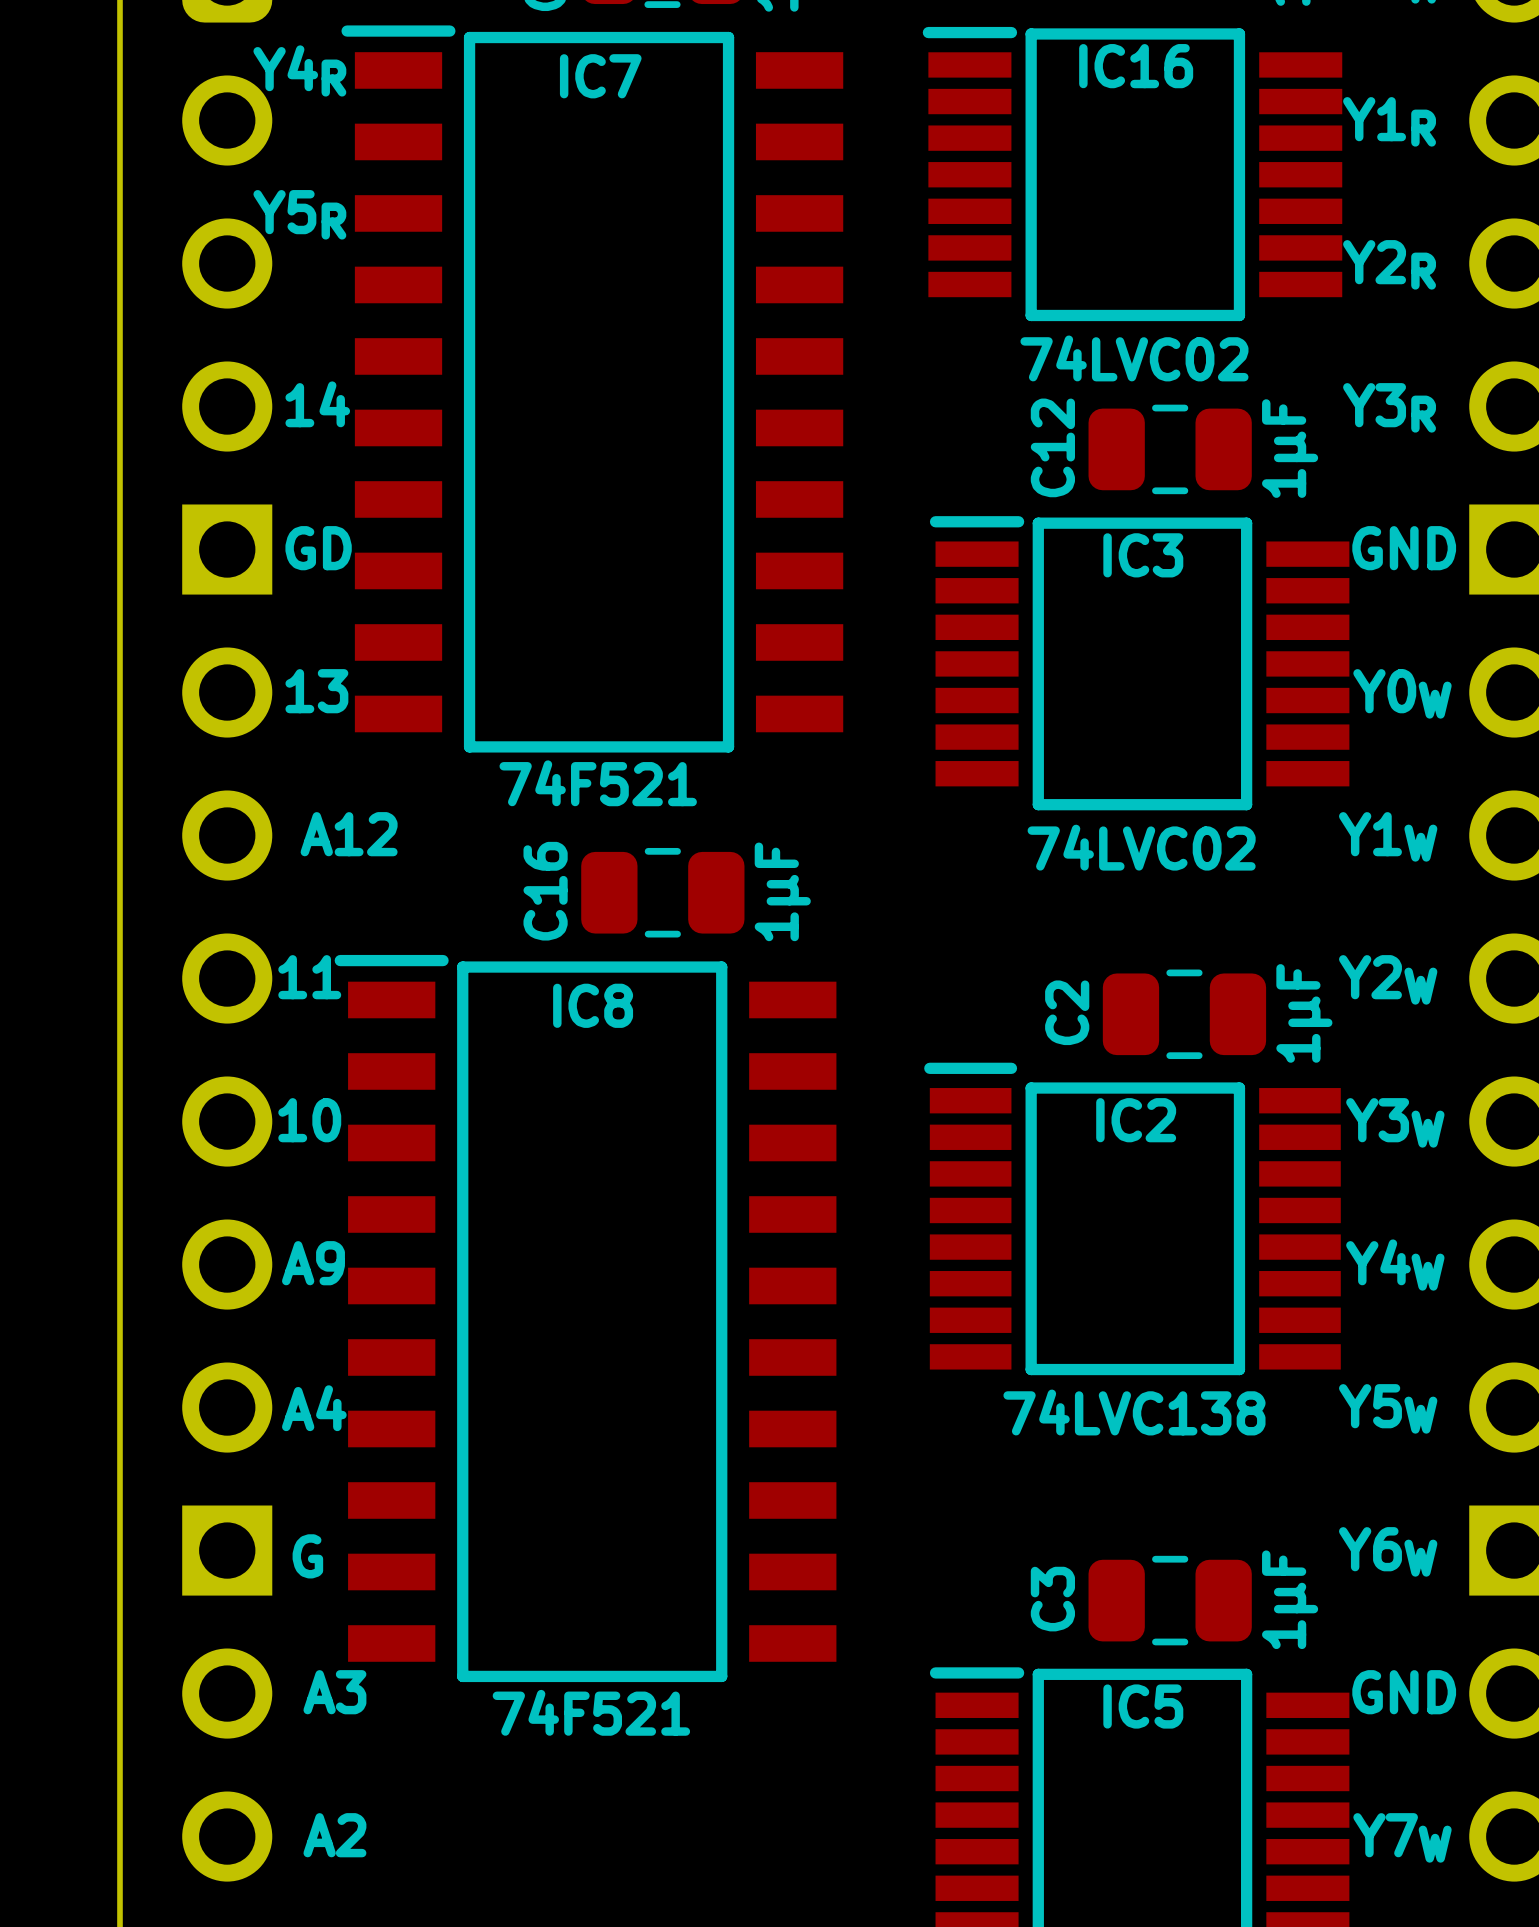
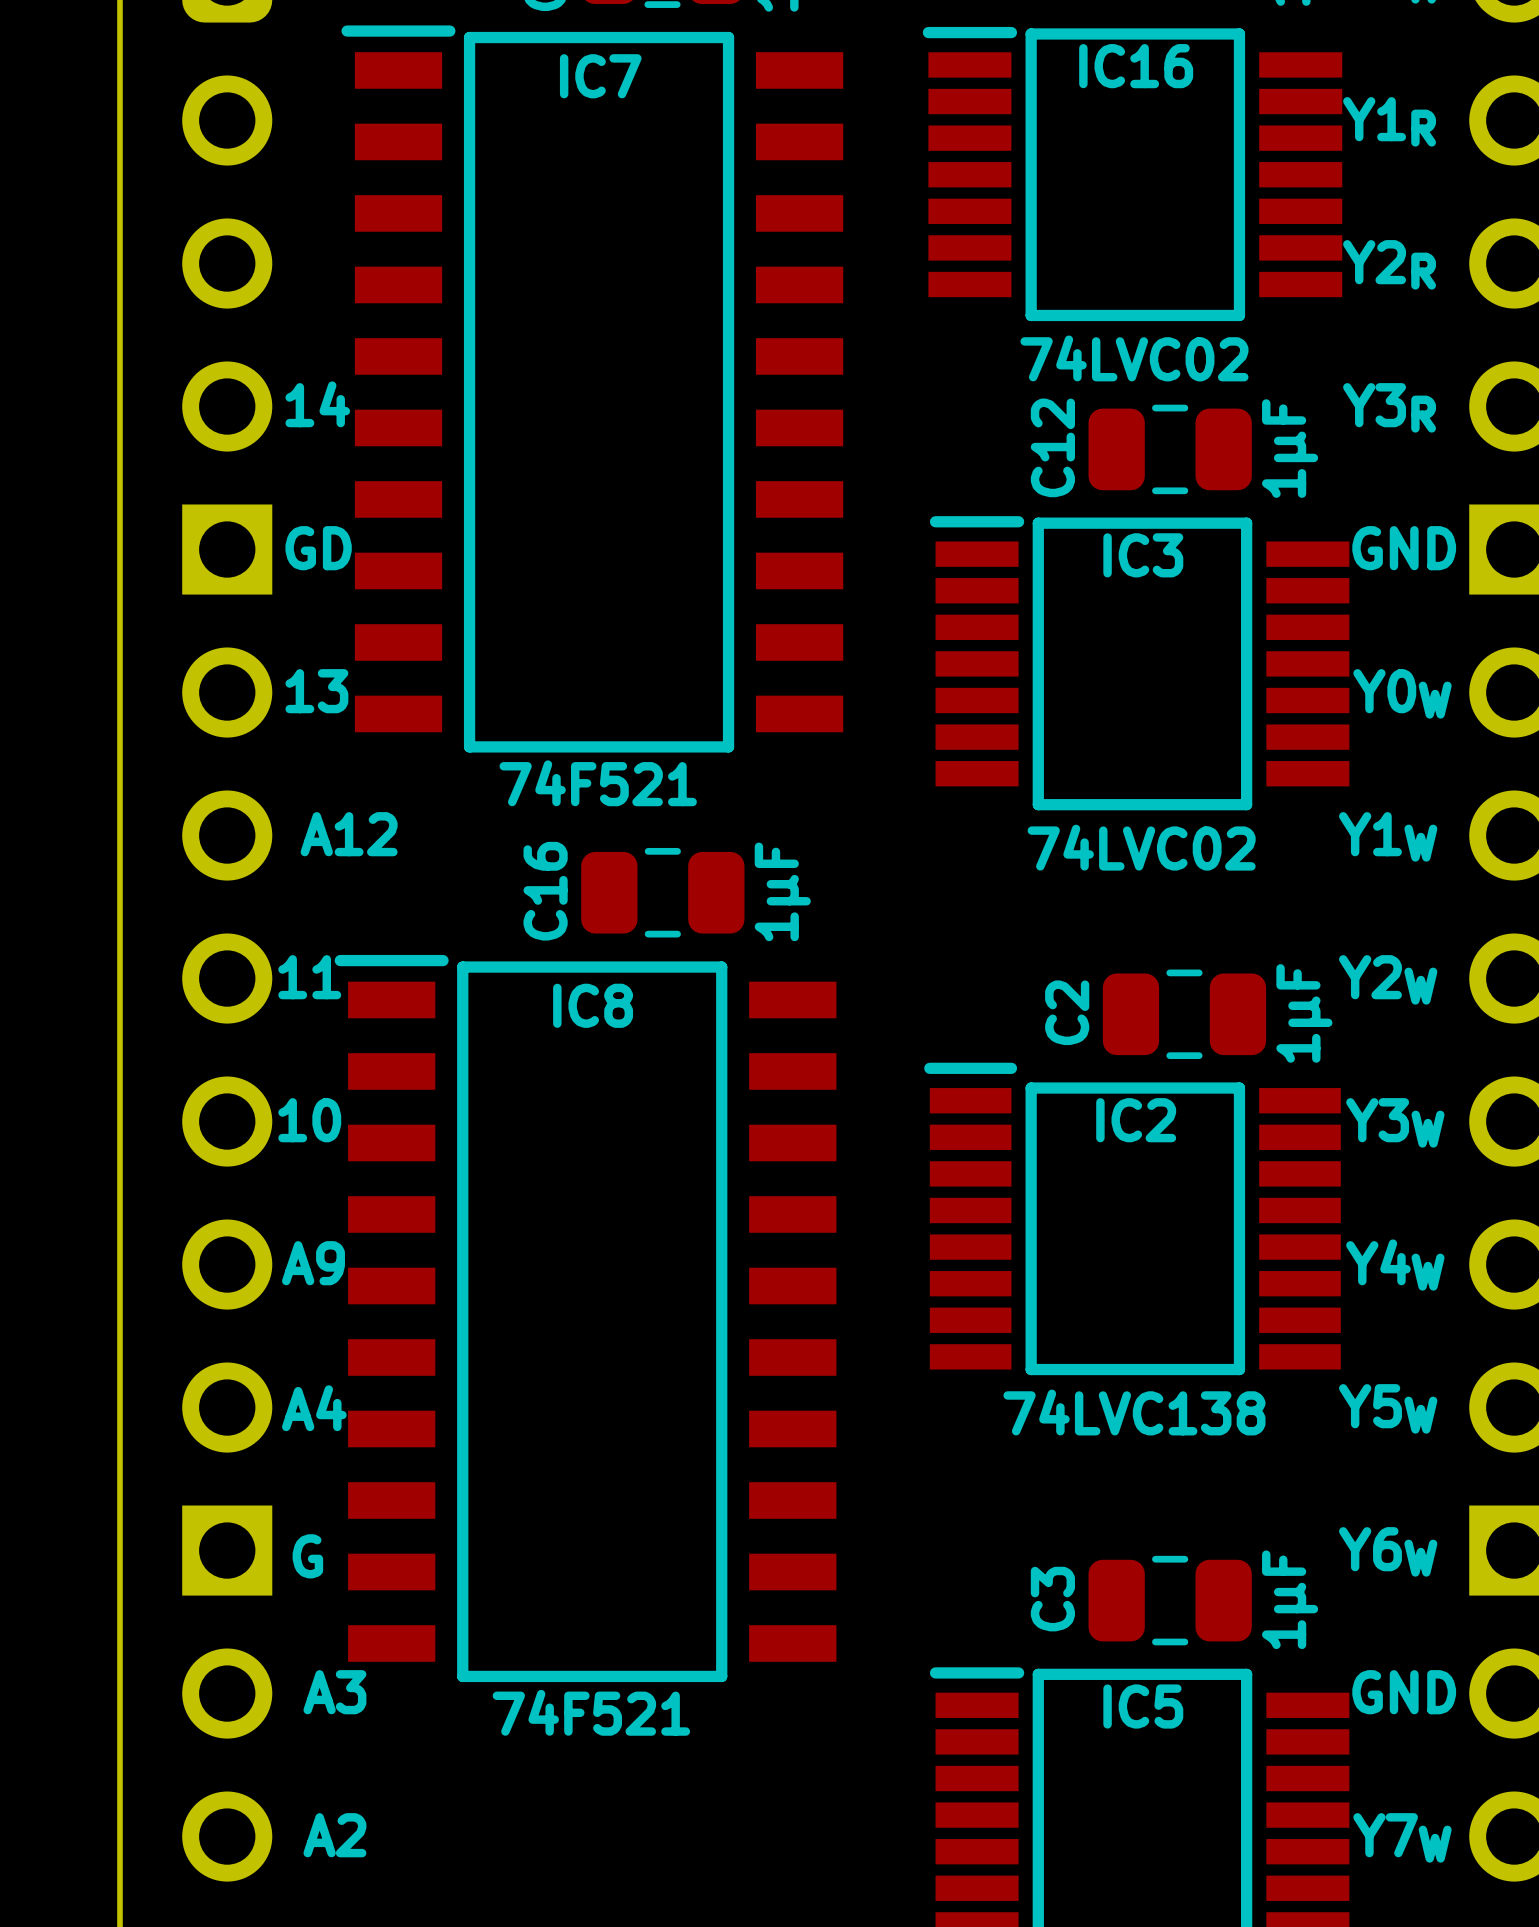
text: Y4R (299, 70) -> none
text: Y5R (299, 214) -> none

